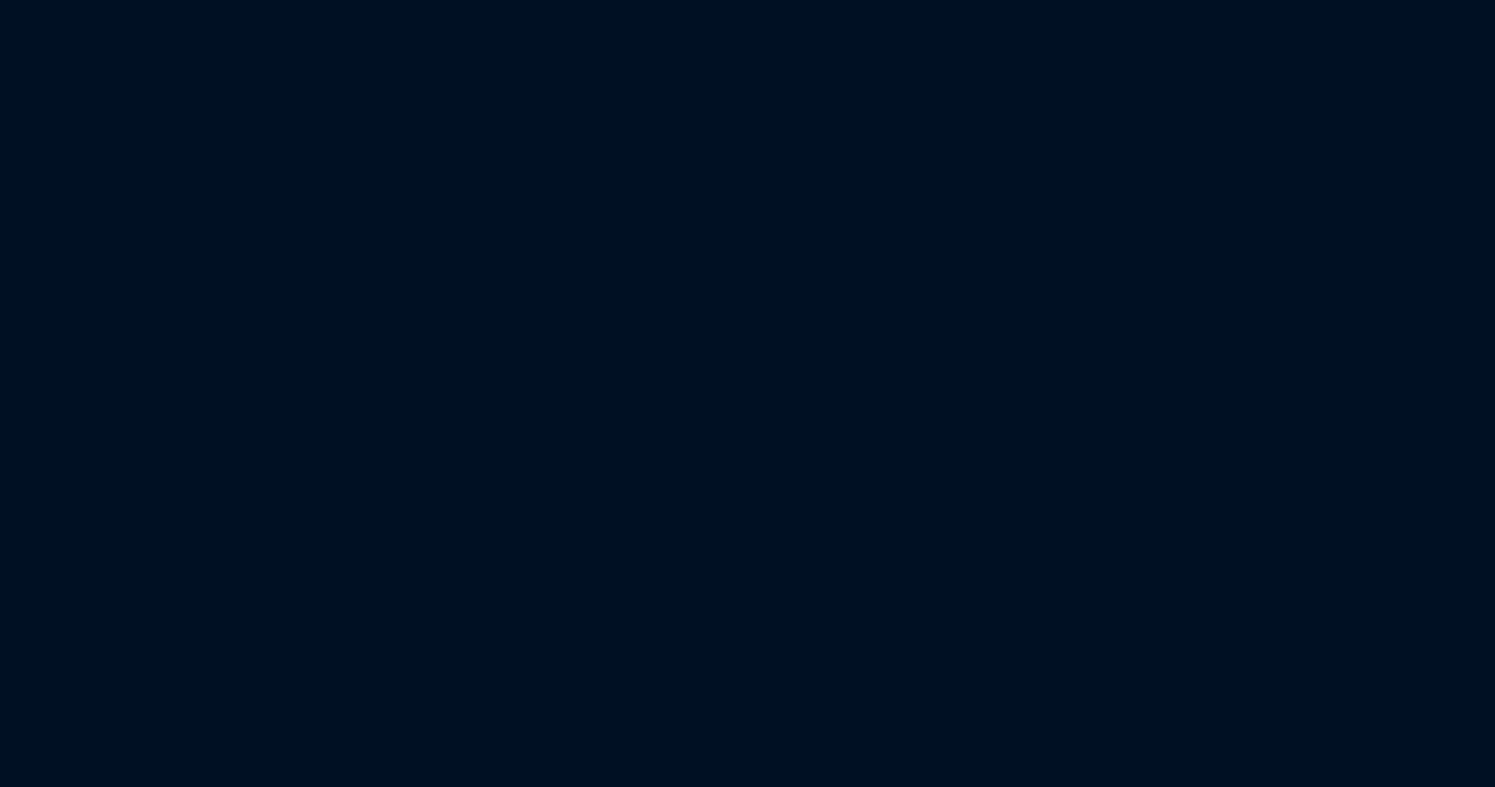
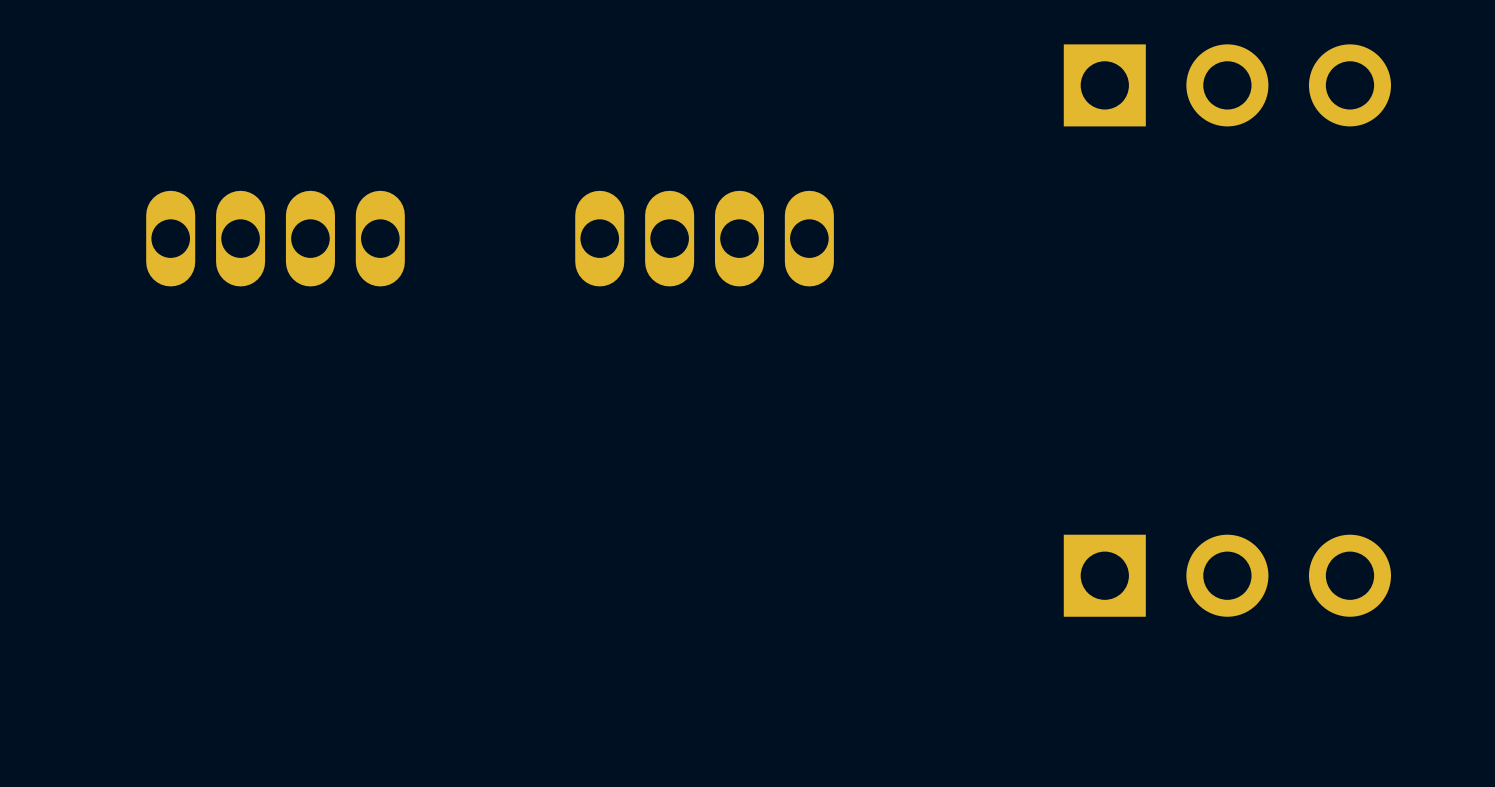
part: none -> (1227, 85)
part: none -> (275, 238)
part: none -> (704, 238)
part: none -> (1227, 575)

